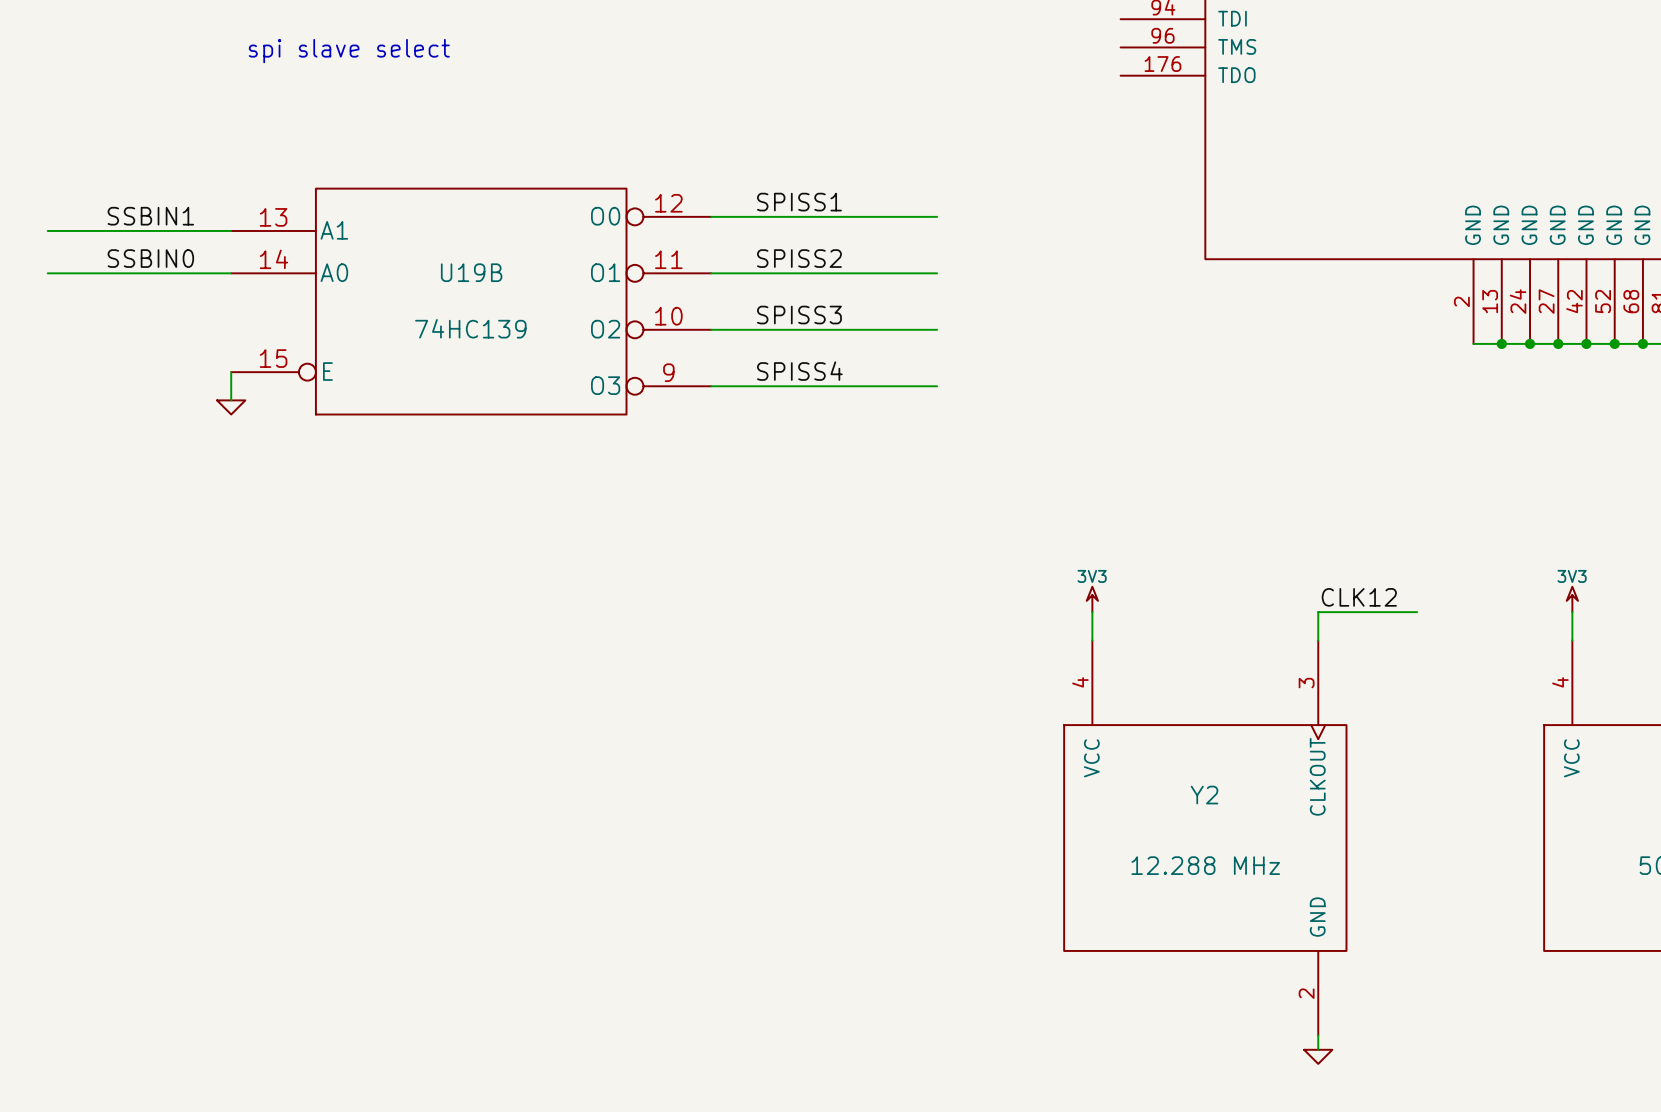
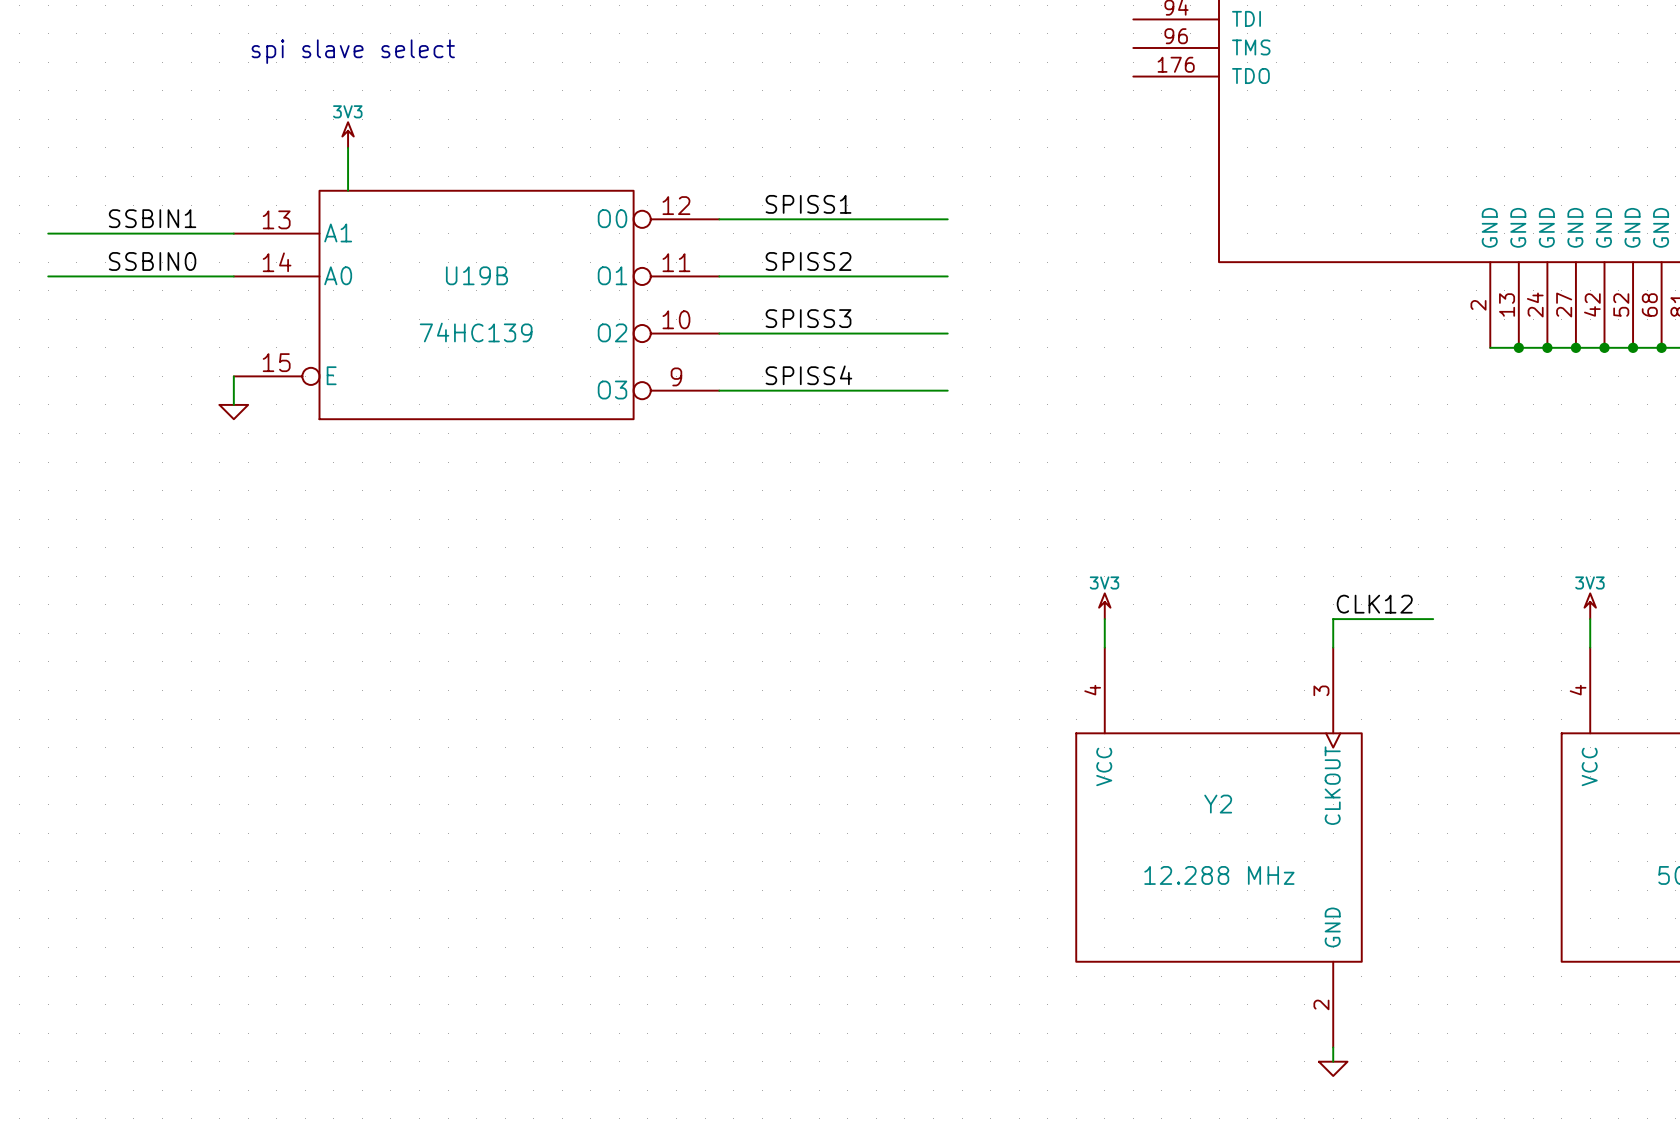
power symbol: none -> 3V3 (348, 135)
wire: none -> (348, 147) (348, 190)

